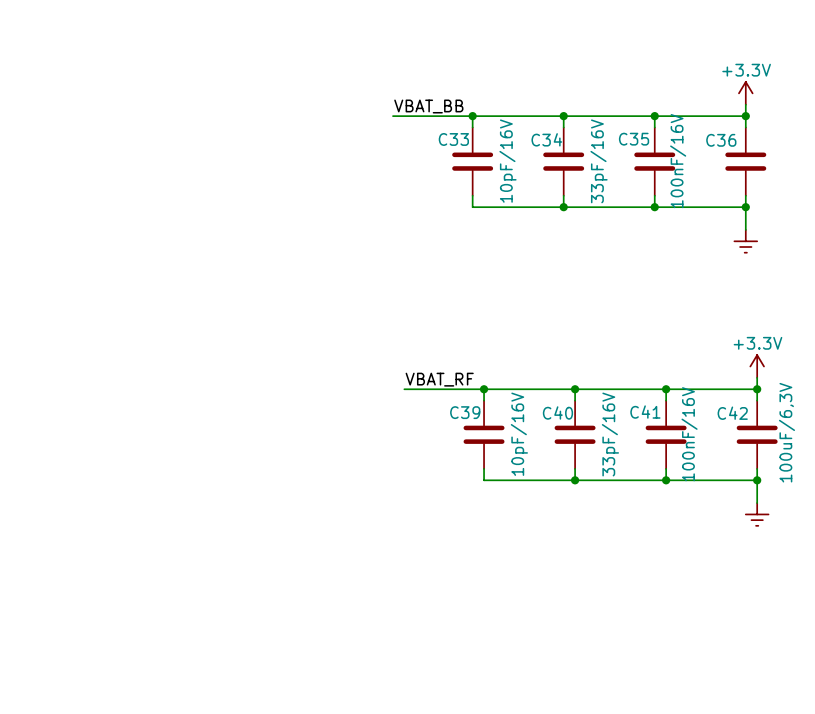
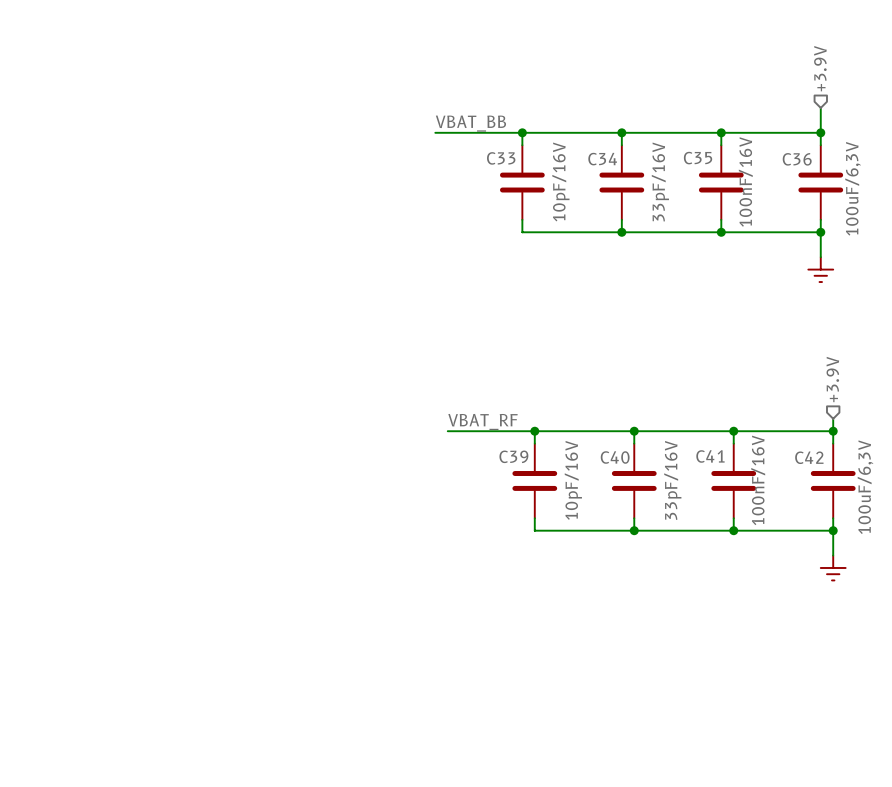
hierarchical label: none -> +3.9V (820, 68)
power symbol: +3.3V (745, 93) -> none
C36 value: none -> 100uF/6,3V (853, 188)
hierarchical label: none -> +3.9V (832, 379)
power symbol: +3.3V (757, 366) -> none

